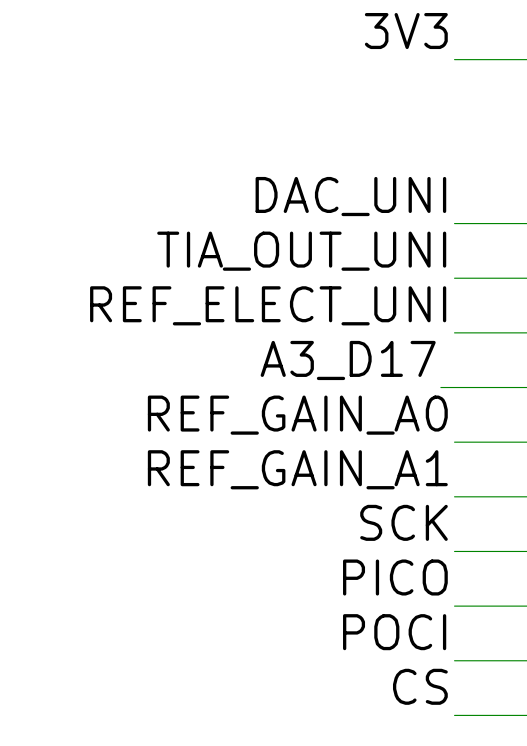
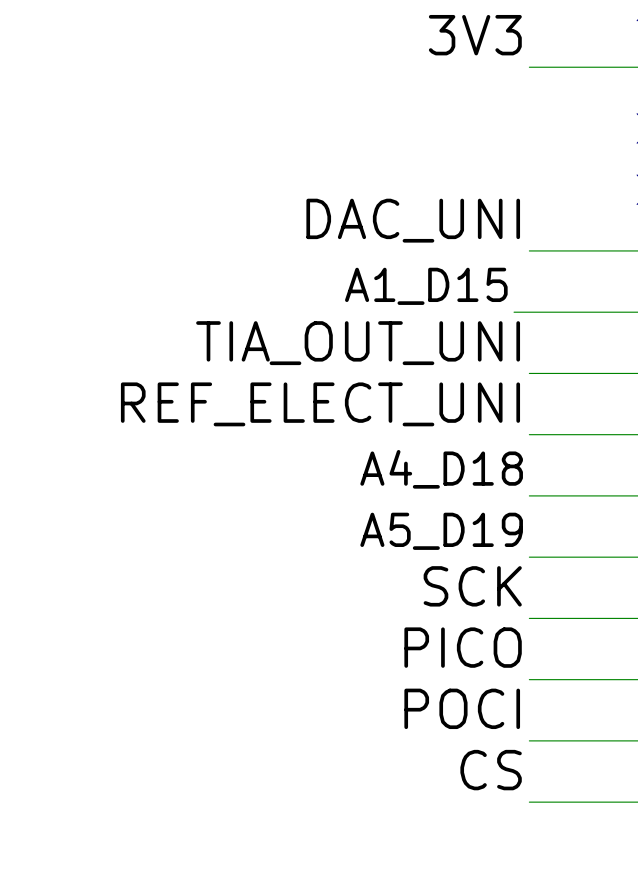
label: TIA_OUT_UNI (301, 251) -> A1_D15 (426, 286)
label: REF_ELECT_UNI (268, 305) -> TIA_OUT_UNI (358, 343)
label: A3_D17 (348, 360) -> REF_ELECT_UNI (320, 404)
wire: (440, 387) (454, 387) -> (514, 312) (529, 312)
label: REF_GAIN_A0 (297, 415) -> A4_D18 (441, 469)
label: REF_GAIN_A1 (297, 469) -> A5_D19 (441, 531)

